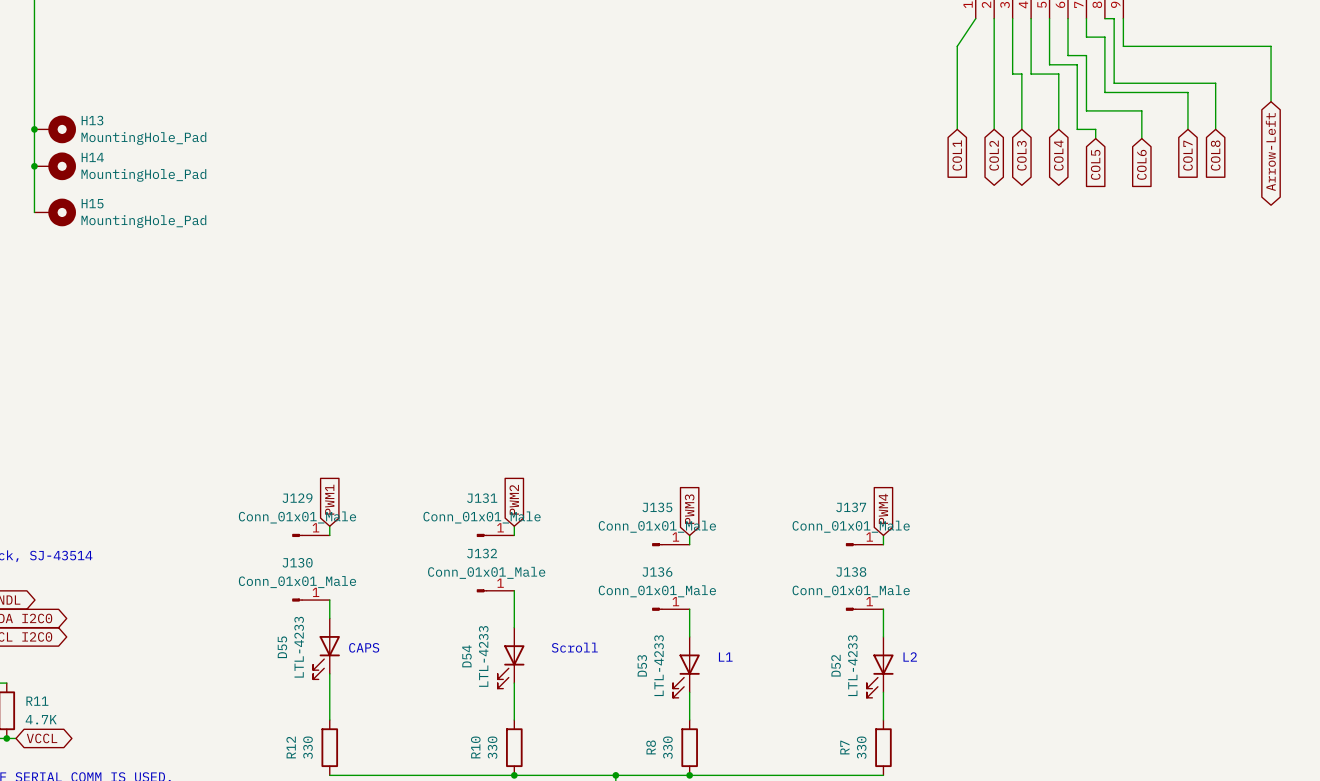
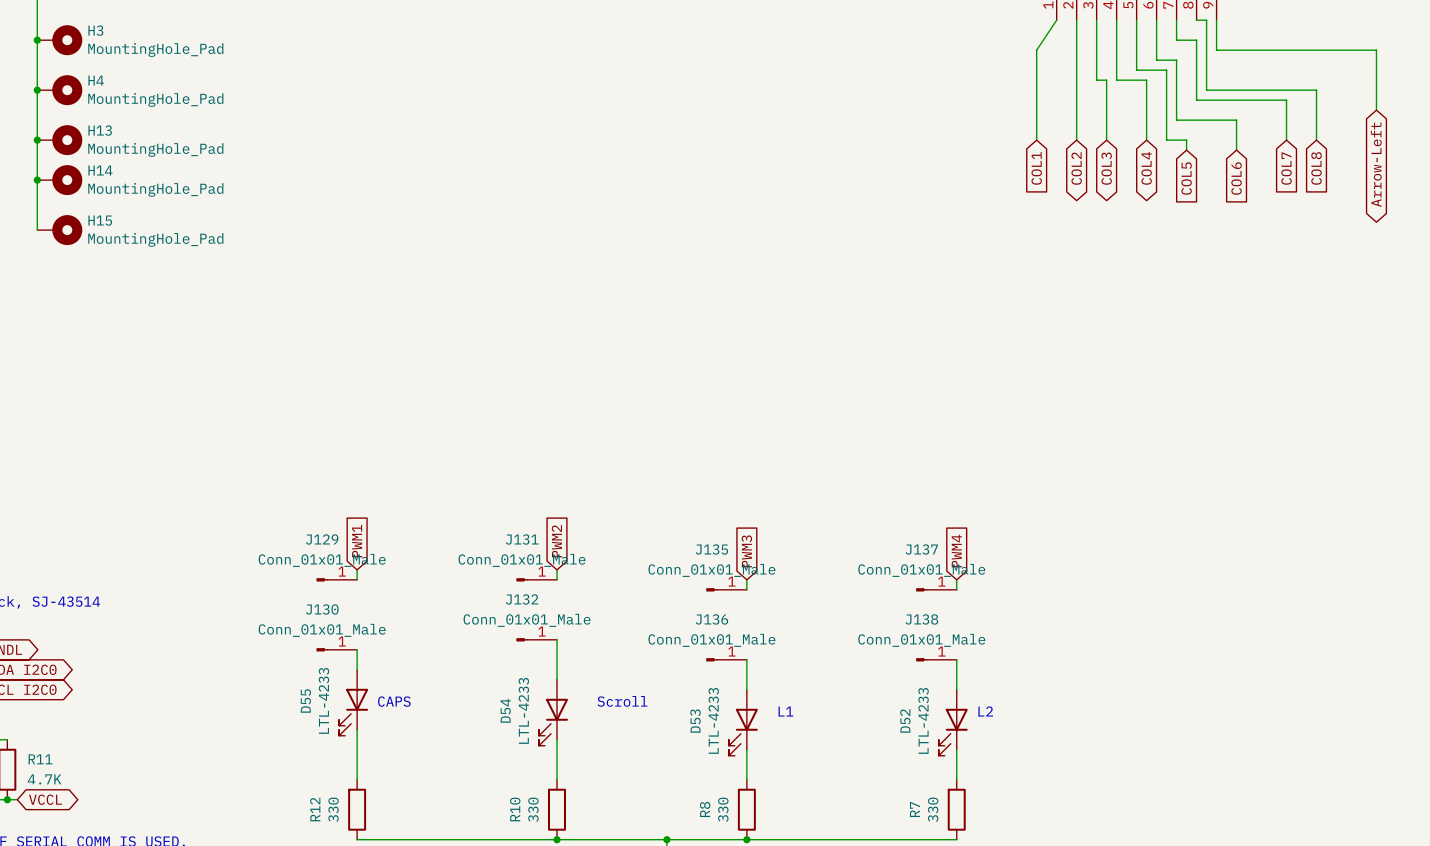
junction: none -> (37, 40)
H3: none -> MountingHole_Pad (59, 40)
junction: none -> (37, 90)
H4: none -> MountingHole_Pad (59, 90)

